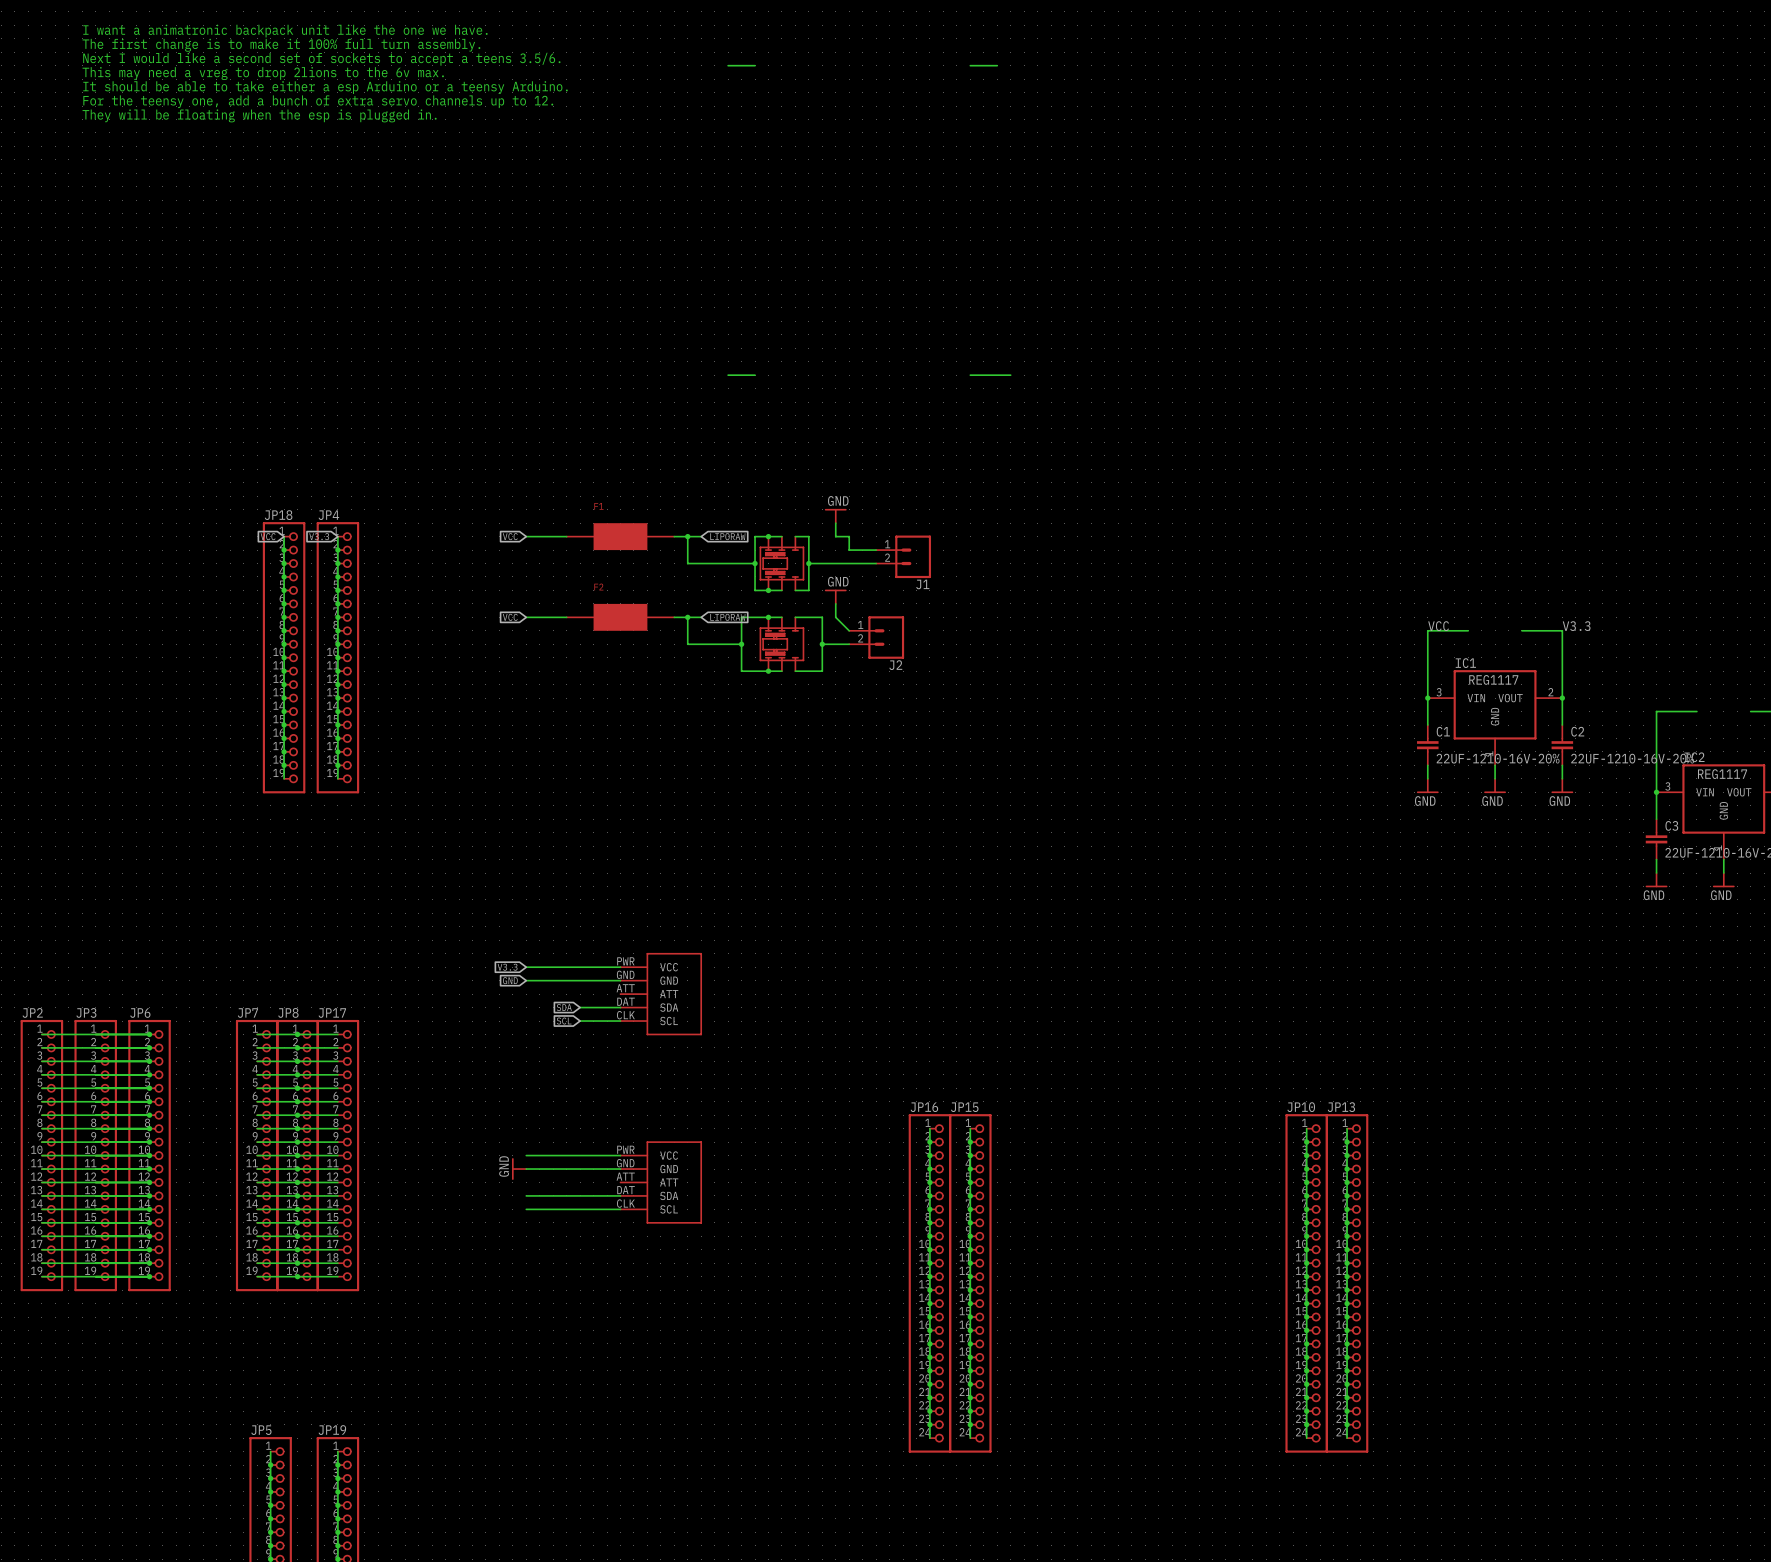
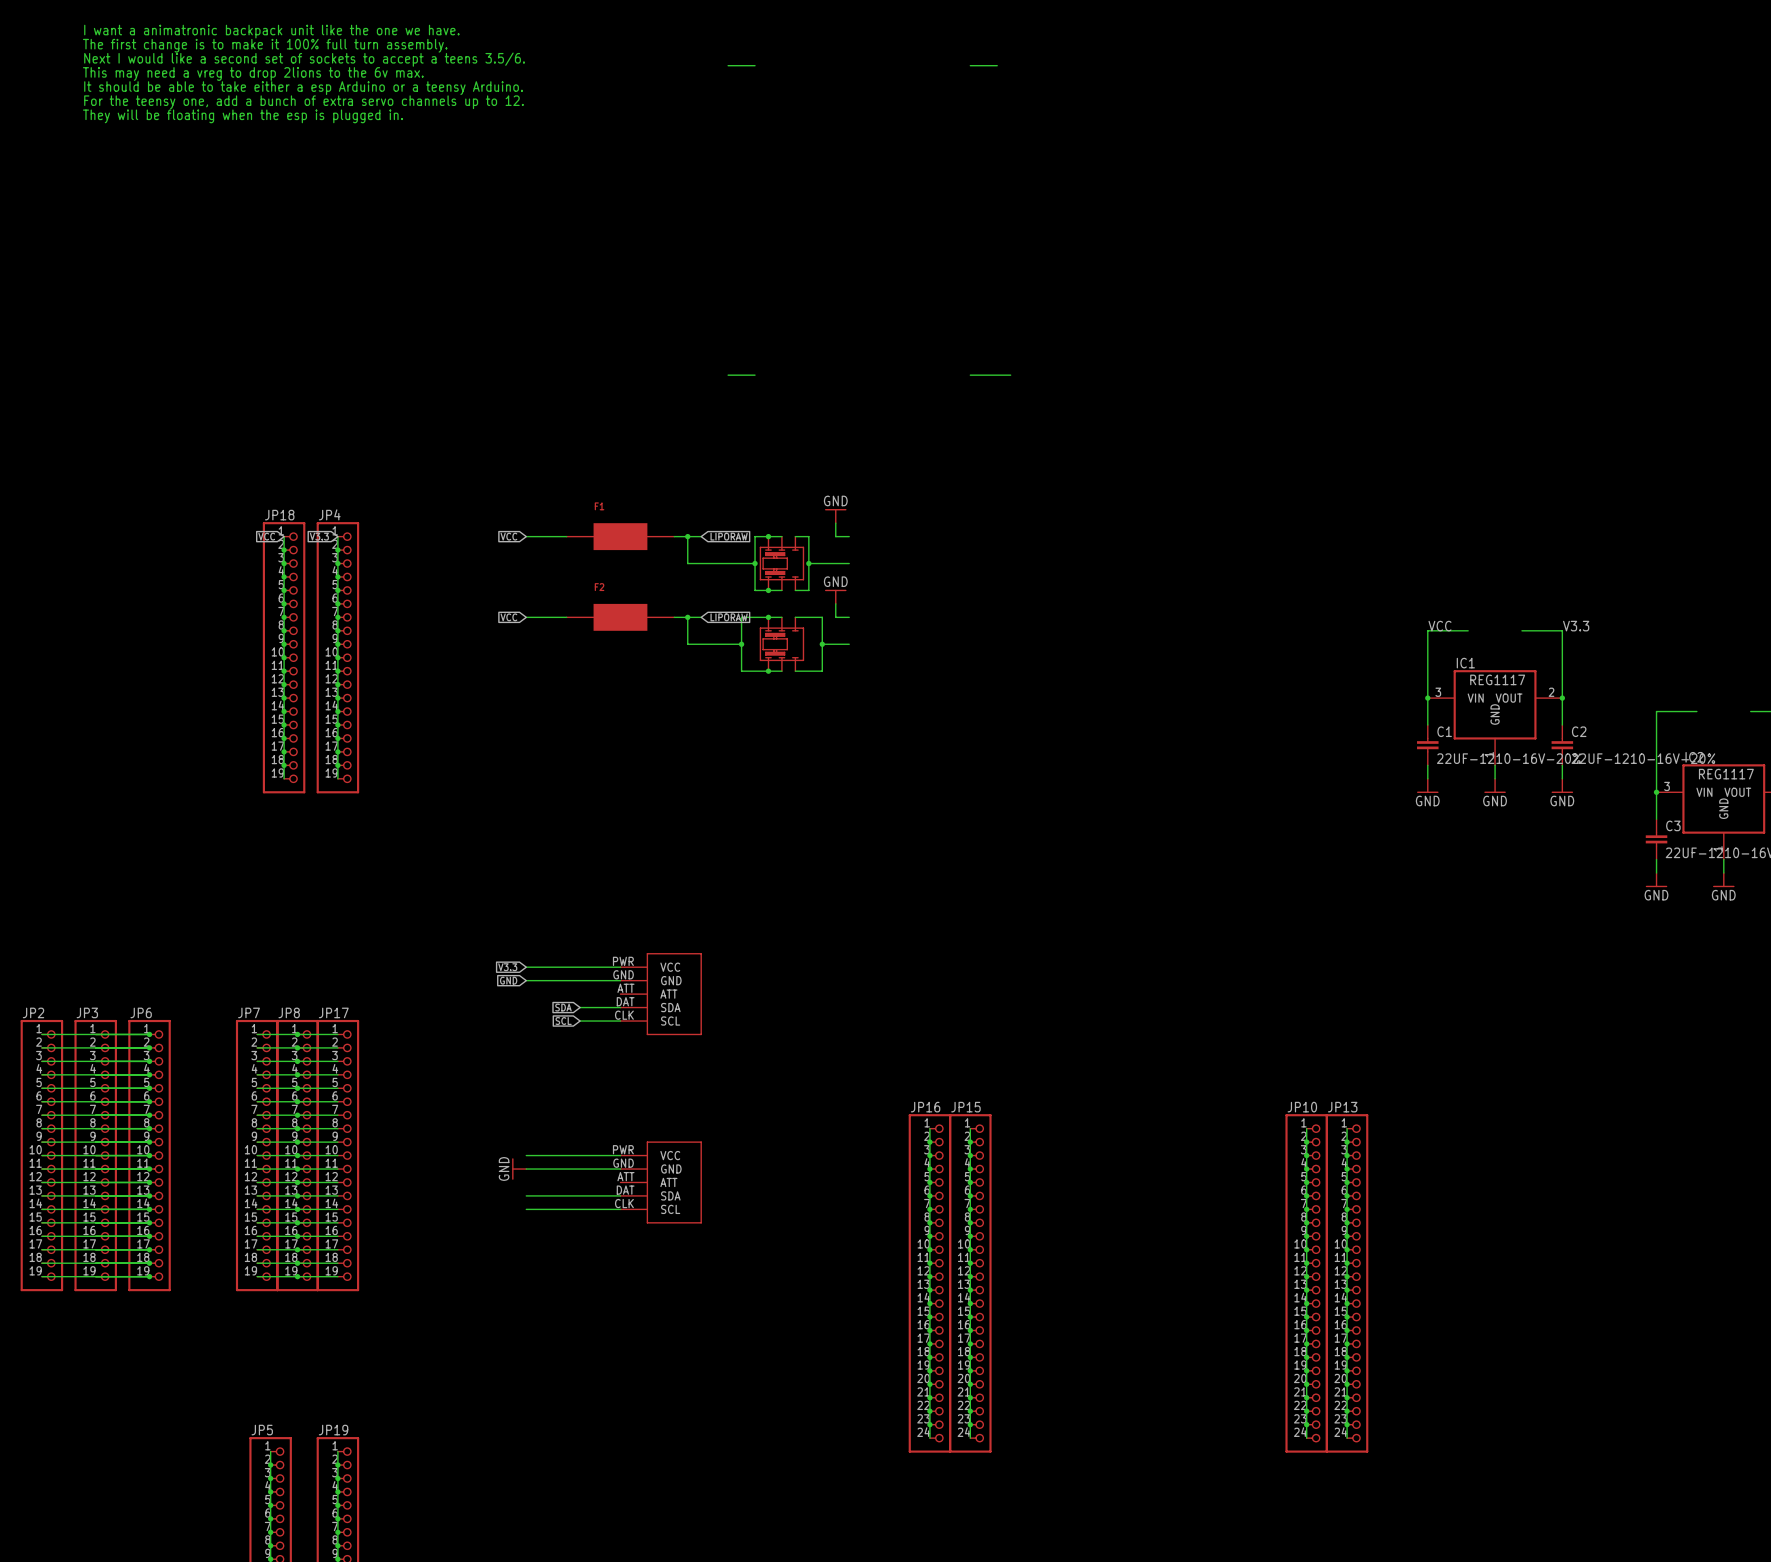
wire: (849, 536) (849, 550) (876, 550) -> none
J1: (903, 556) -> none
wire: (849, 563) (876, 563) -> none
wire: (835, 617) (849, 630) -> (835, 617) (849, 617)
J2: (876, 637) -> none

